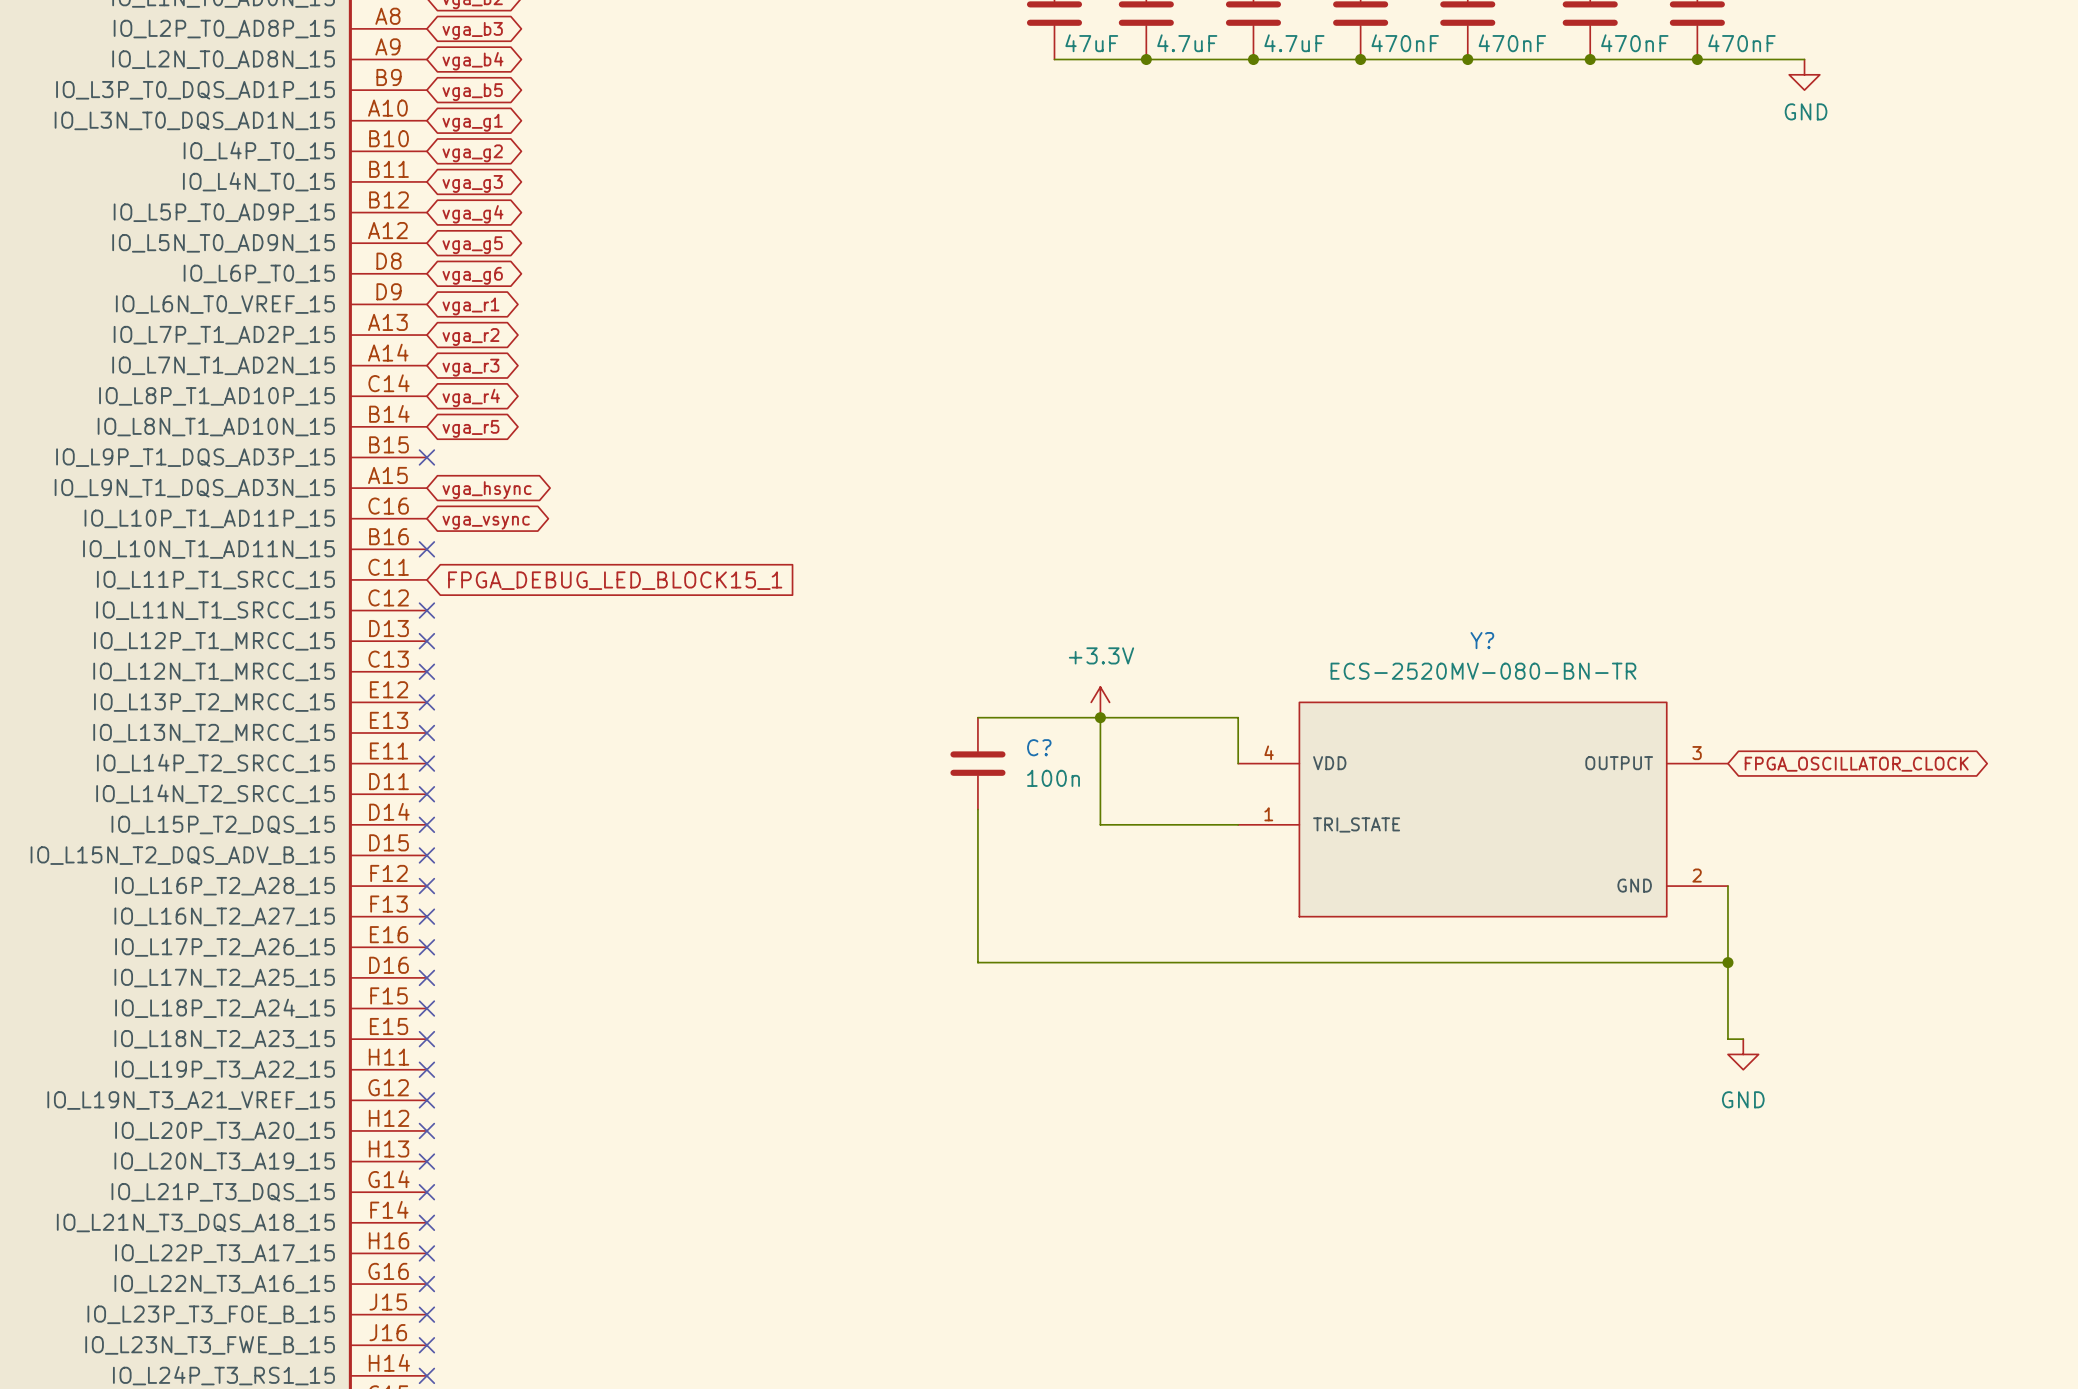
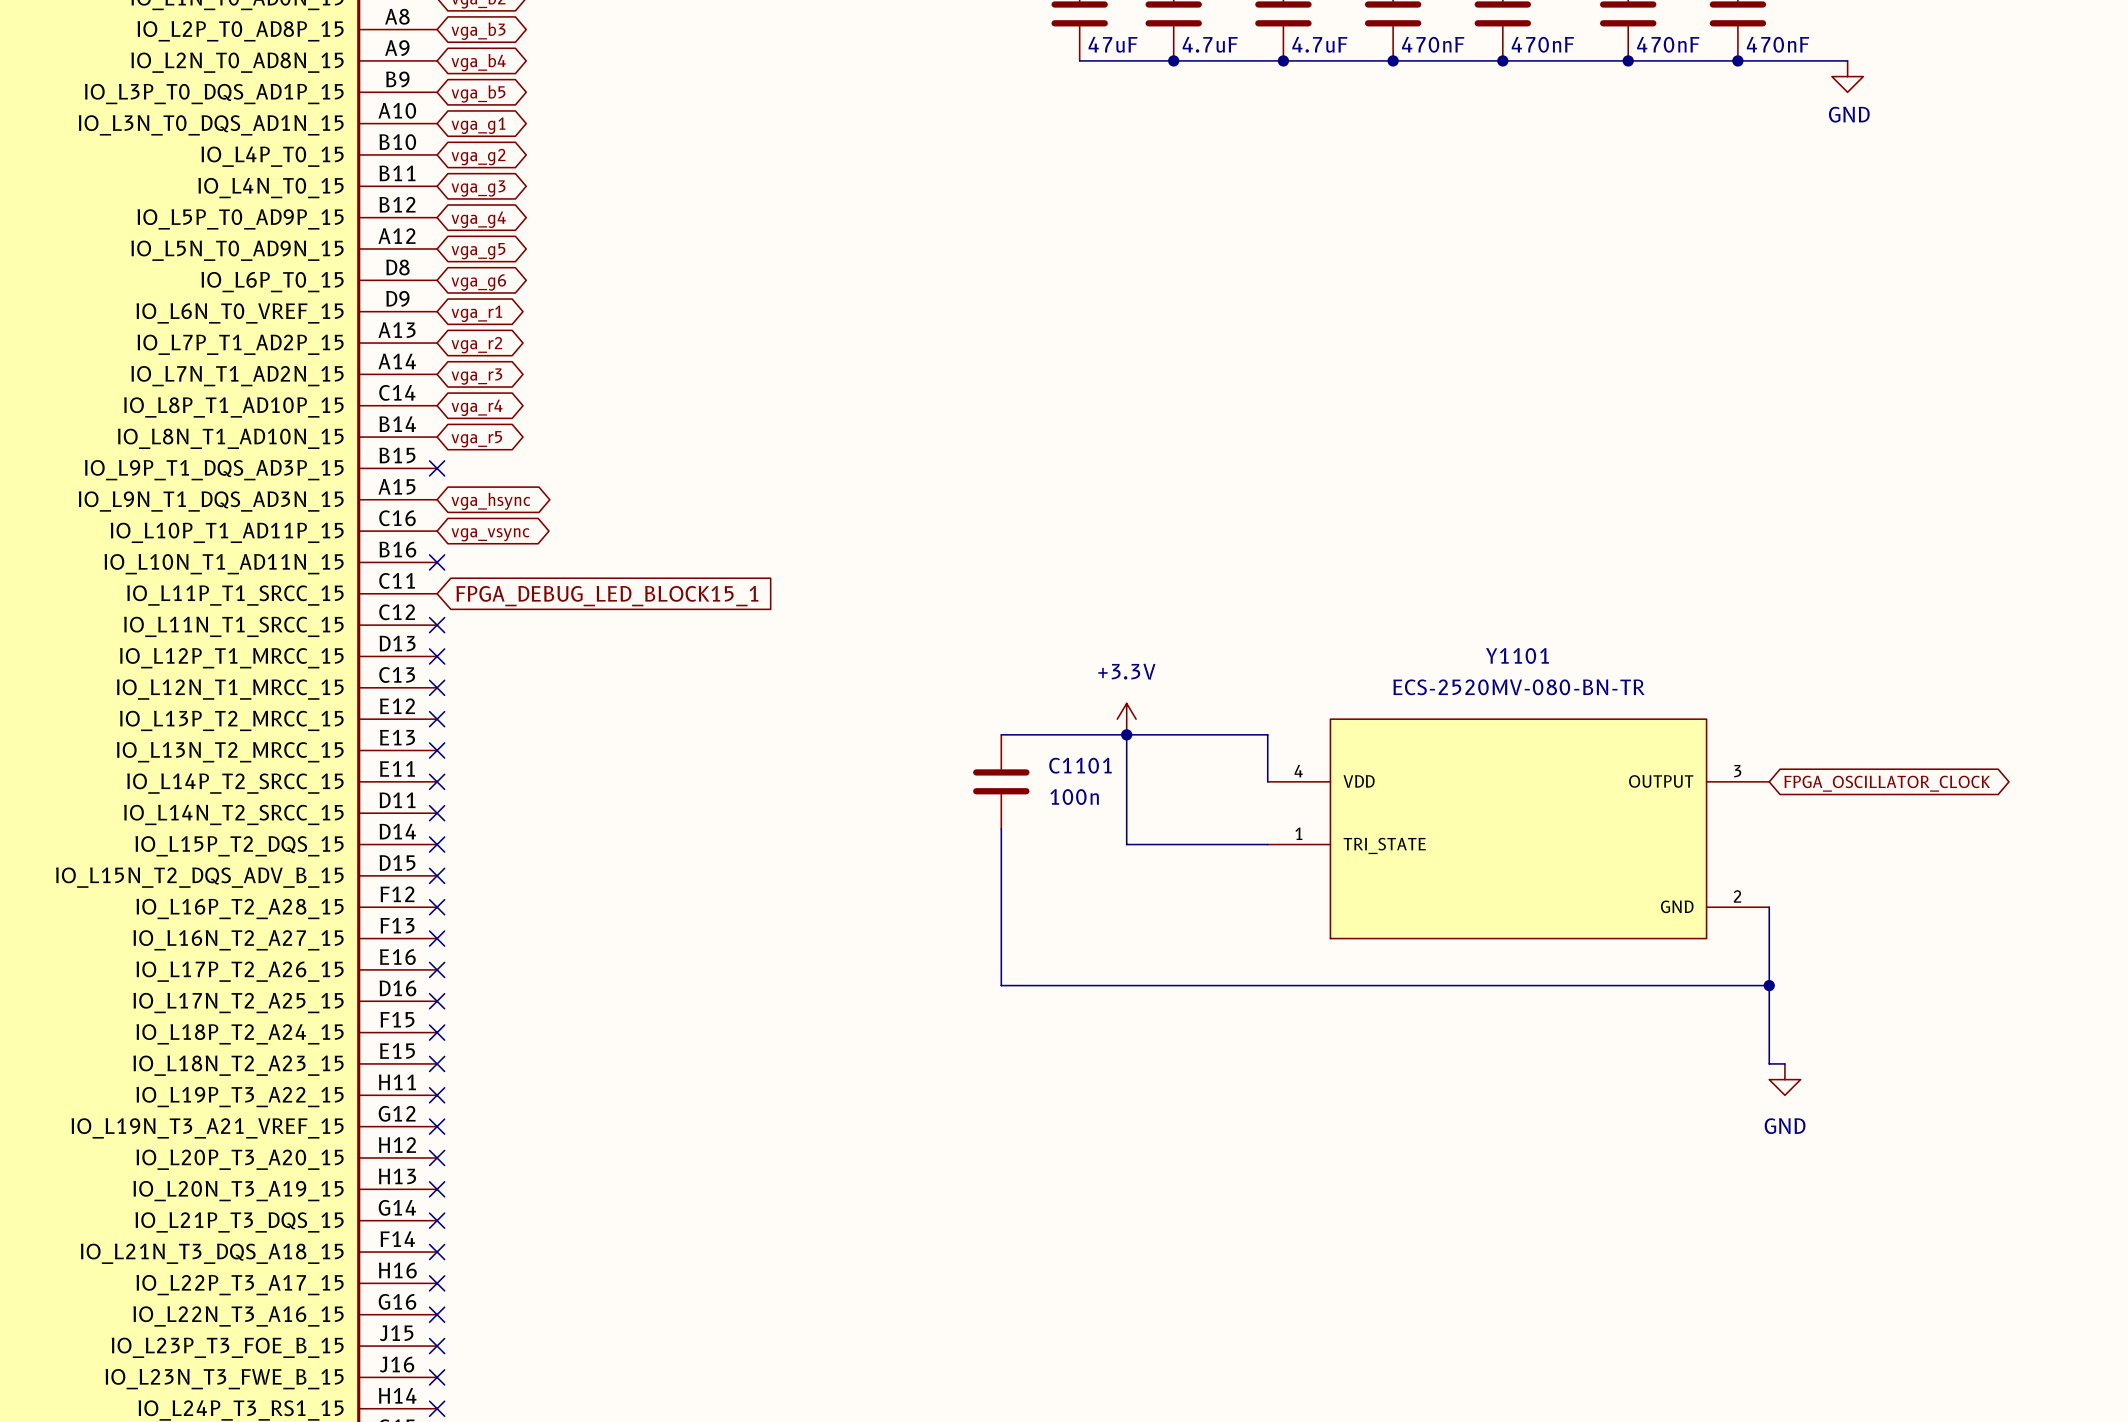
Y? name: Y? (1482, 640) -> Y1101 (1517, 655)
C? name: C? (1039, 747) -> C1101 (1080, 765)

